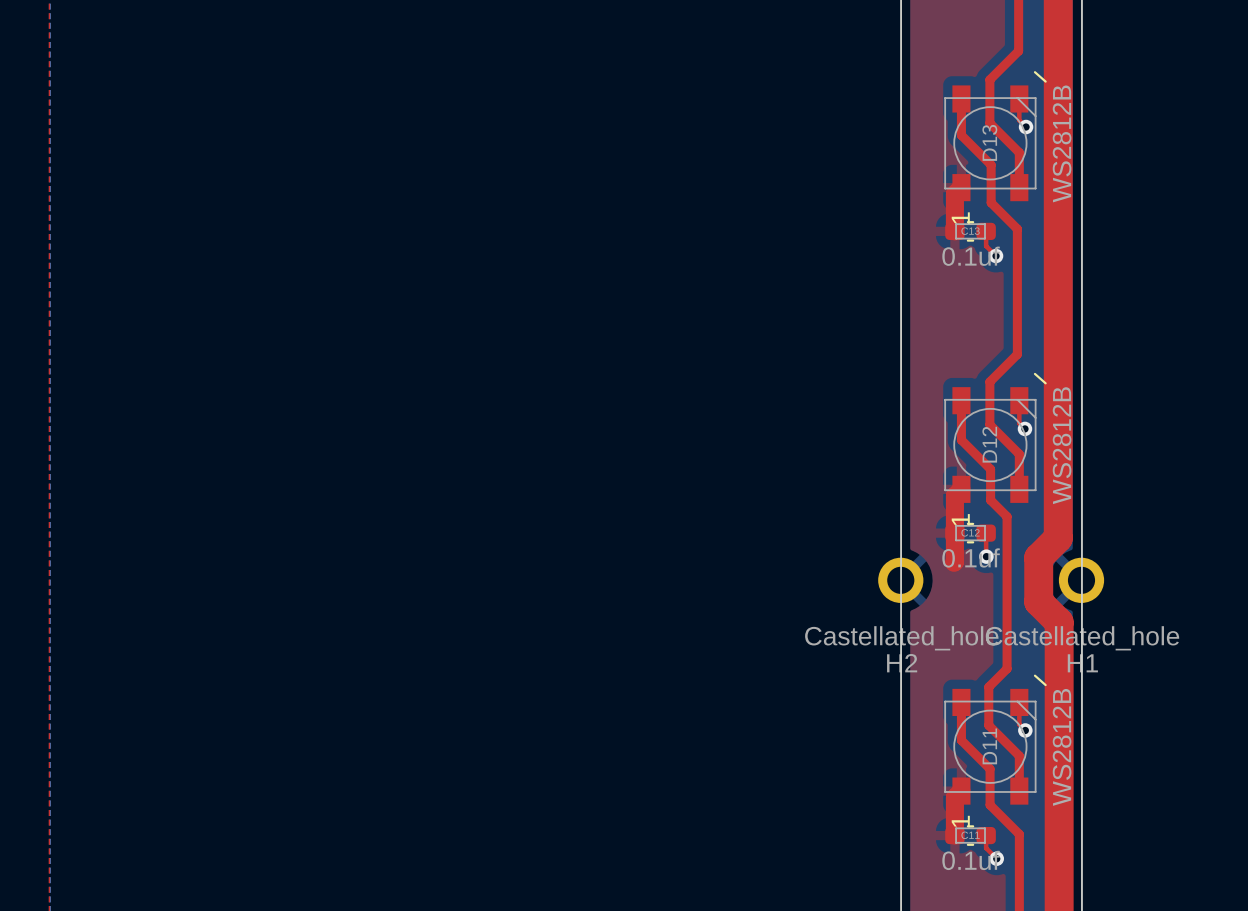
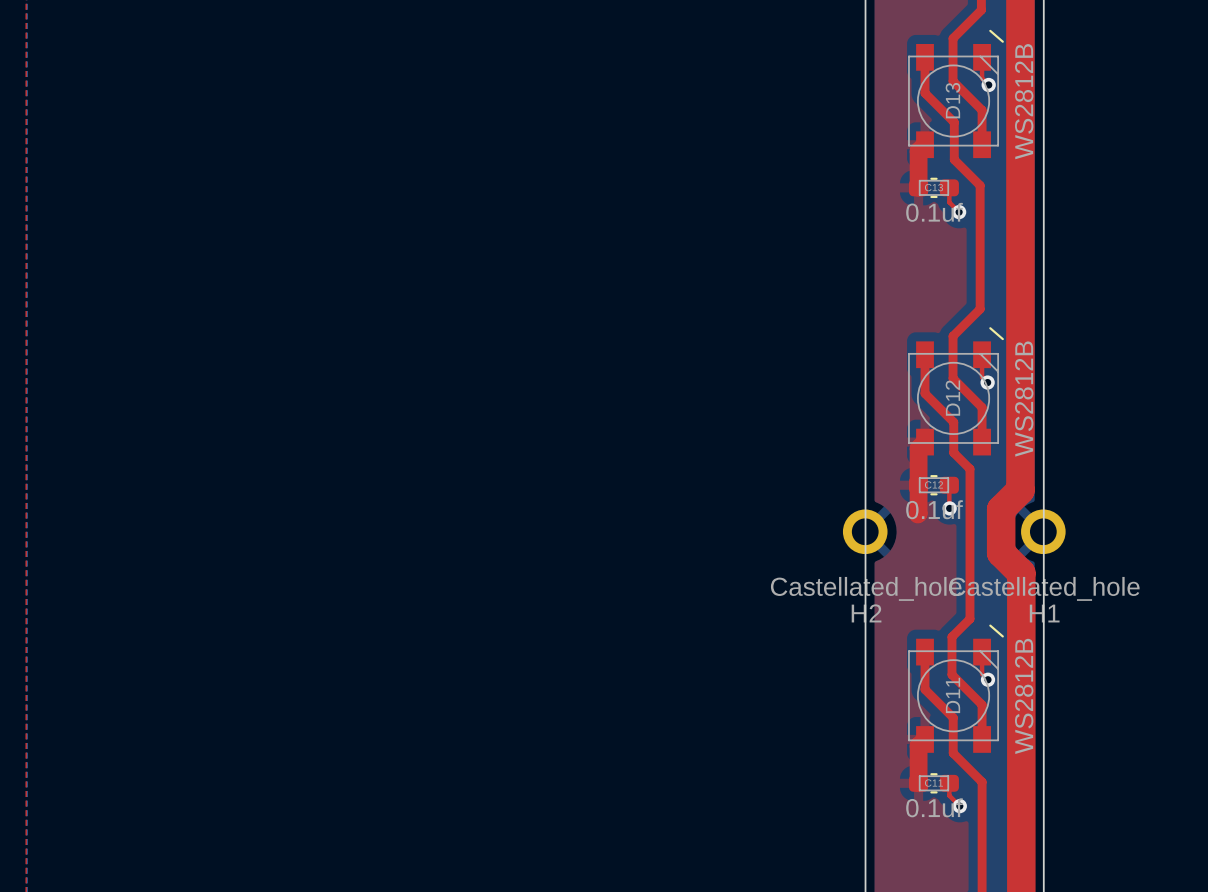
D13 footprint: [944, 71, 1047, 202] -> [908, 29, 1004, 159]
D12 footprint: [944, 372, 1047, 503] -> [908, 327, 1004, 456]
D11 footprint: [944, 674, 1047, 805] -> [908, 624, 1004, 753]

